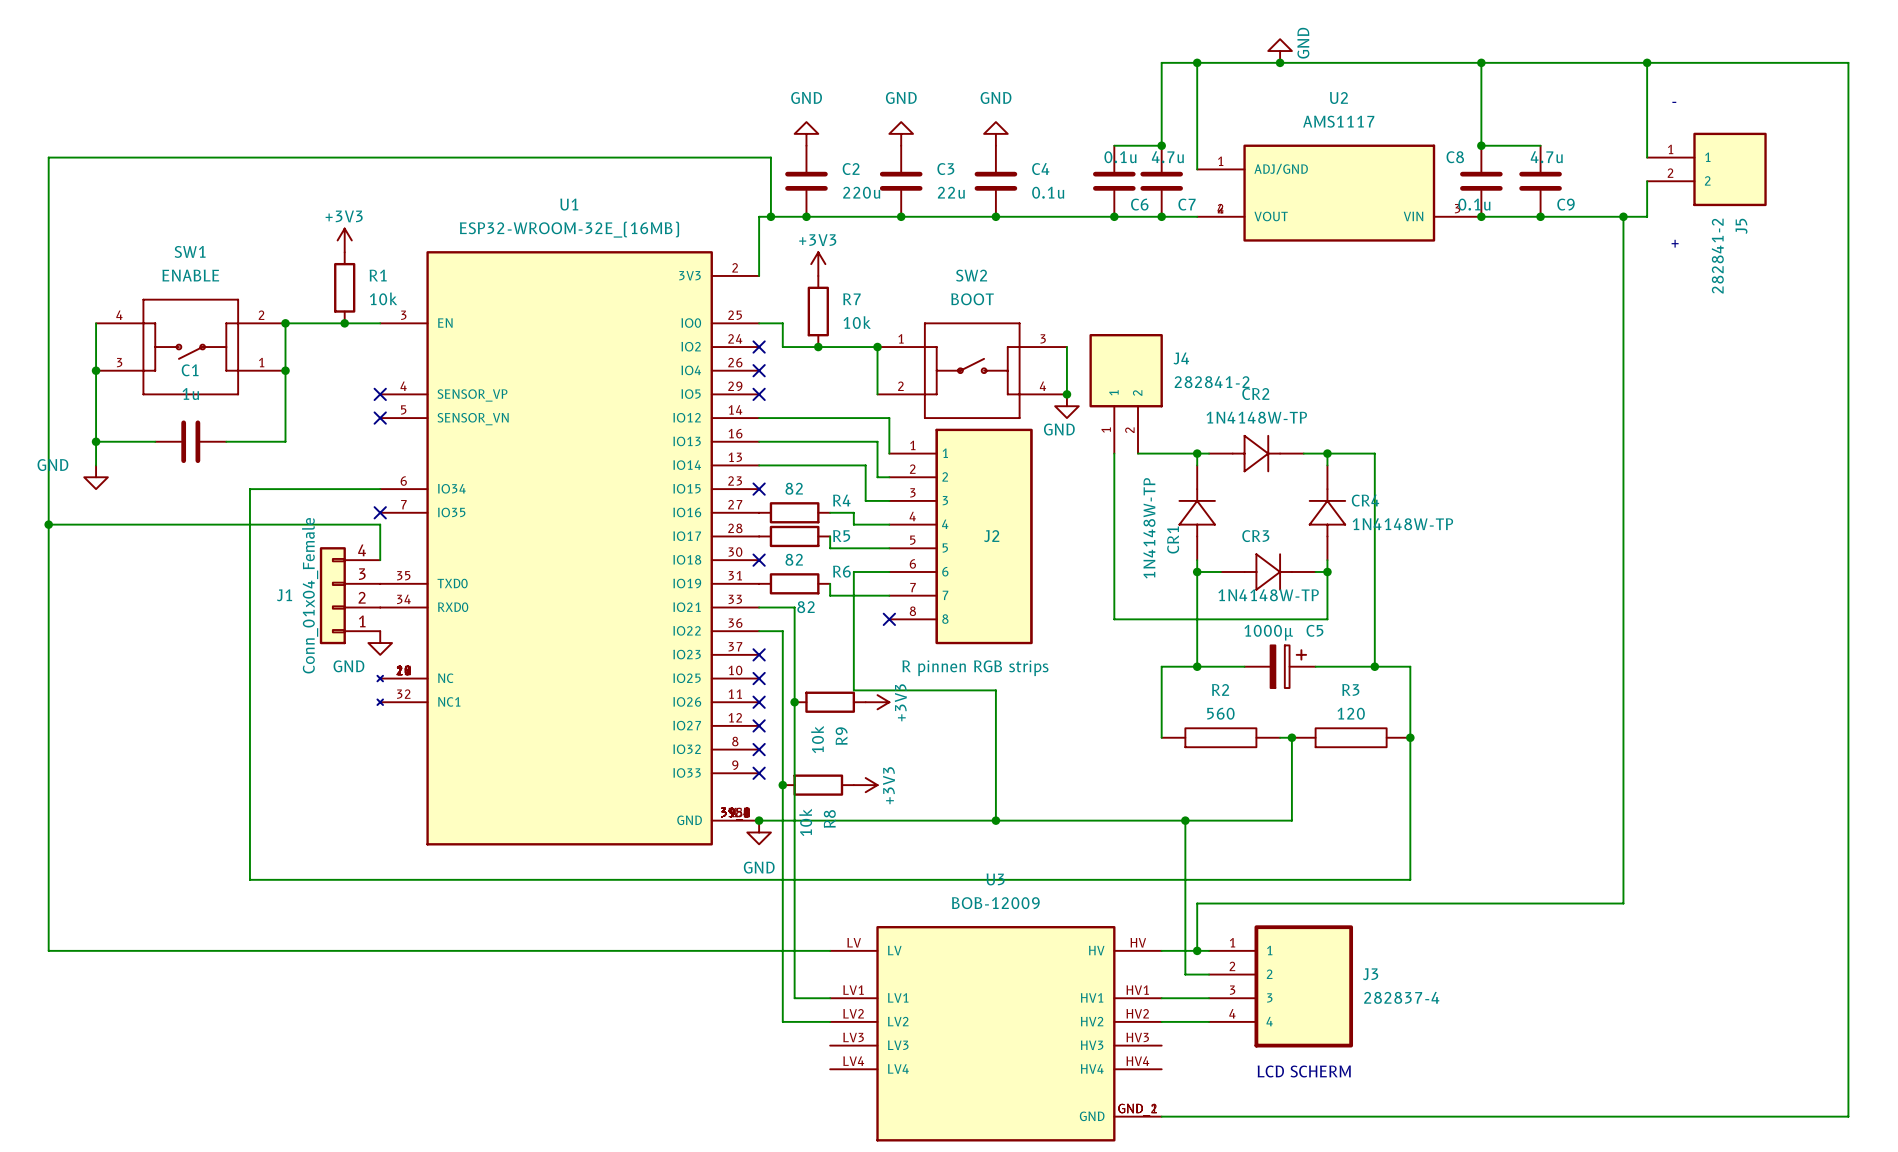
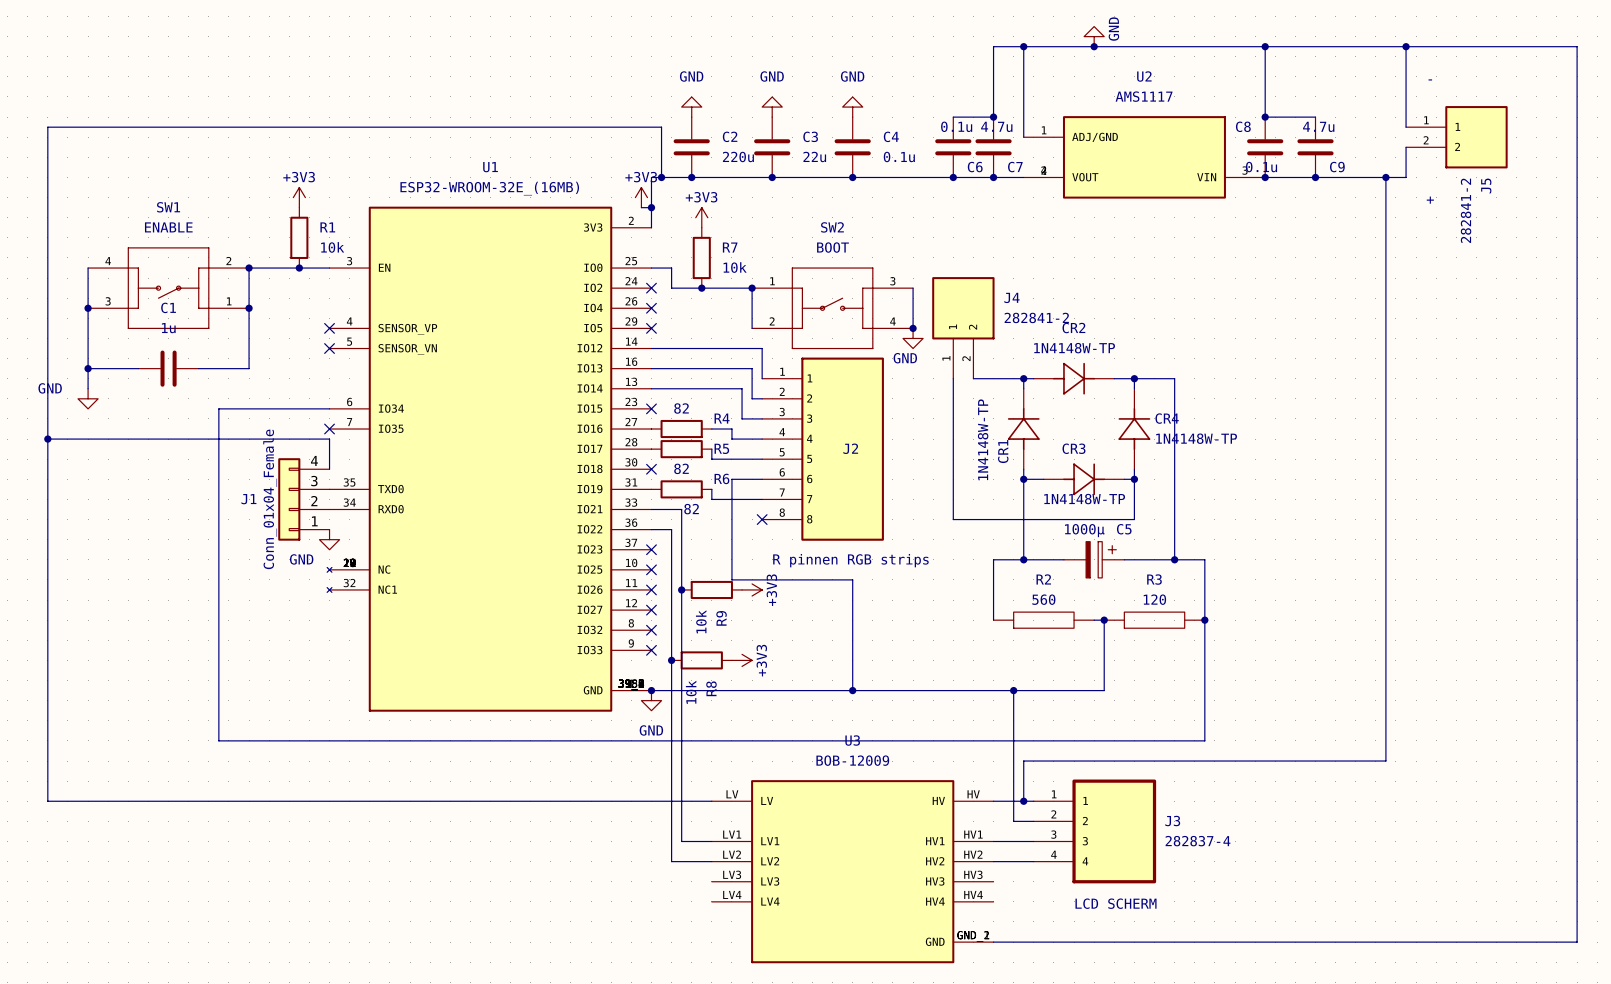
power symbol: none -> +3V3 (641, 197)
wire: none -> (641, 207) (651, 207)
junction: none -> (651, 207)

